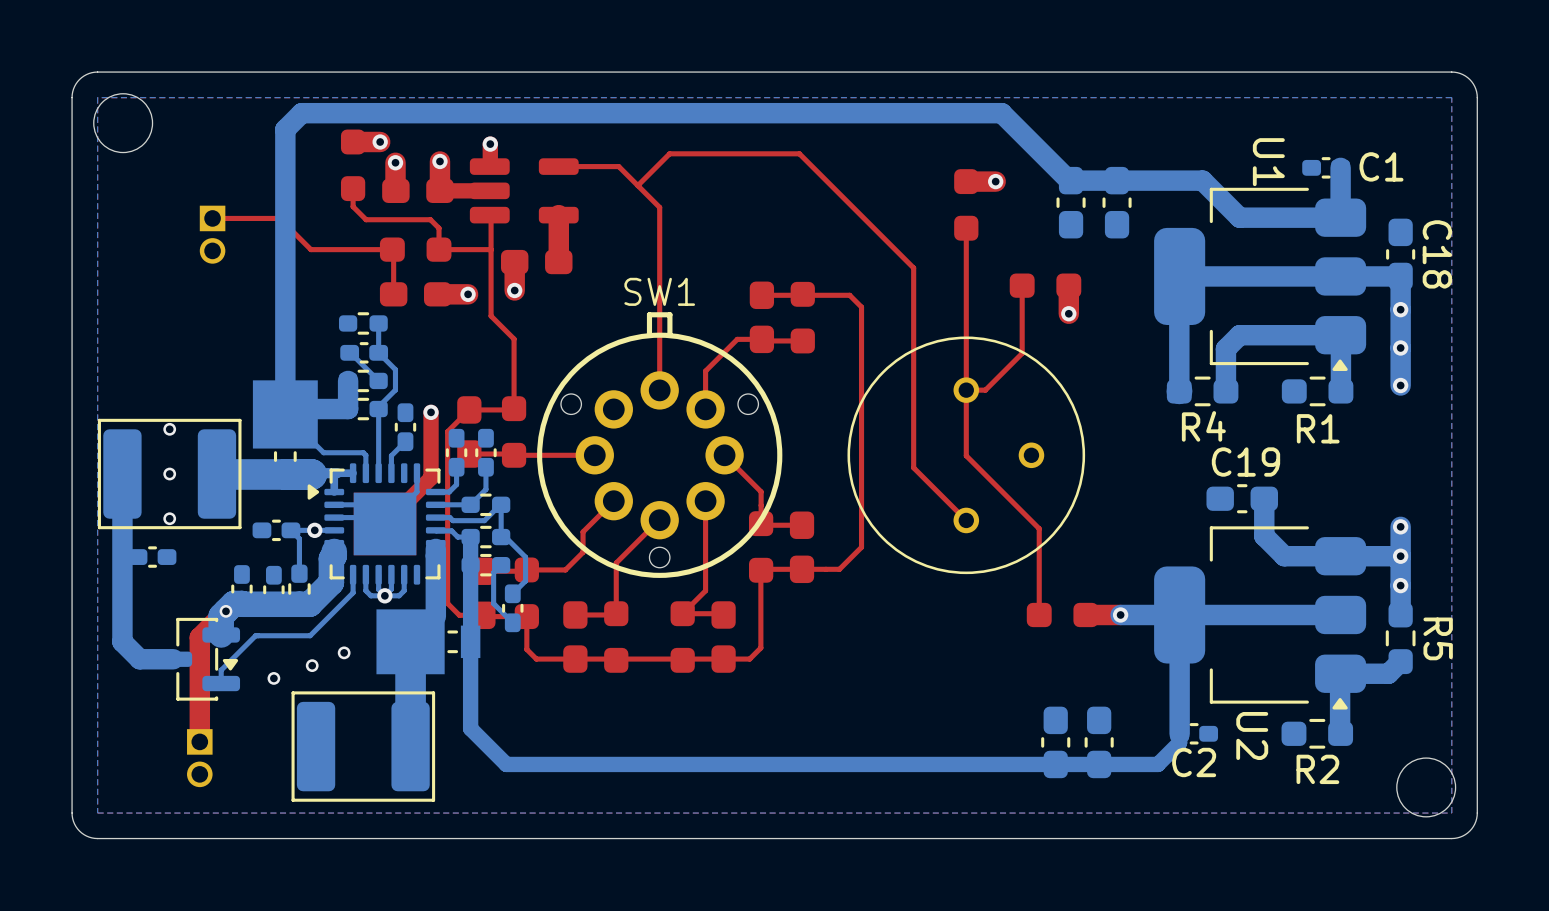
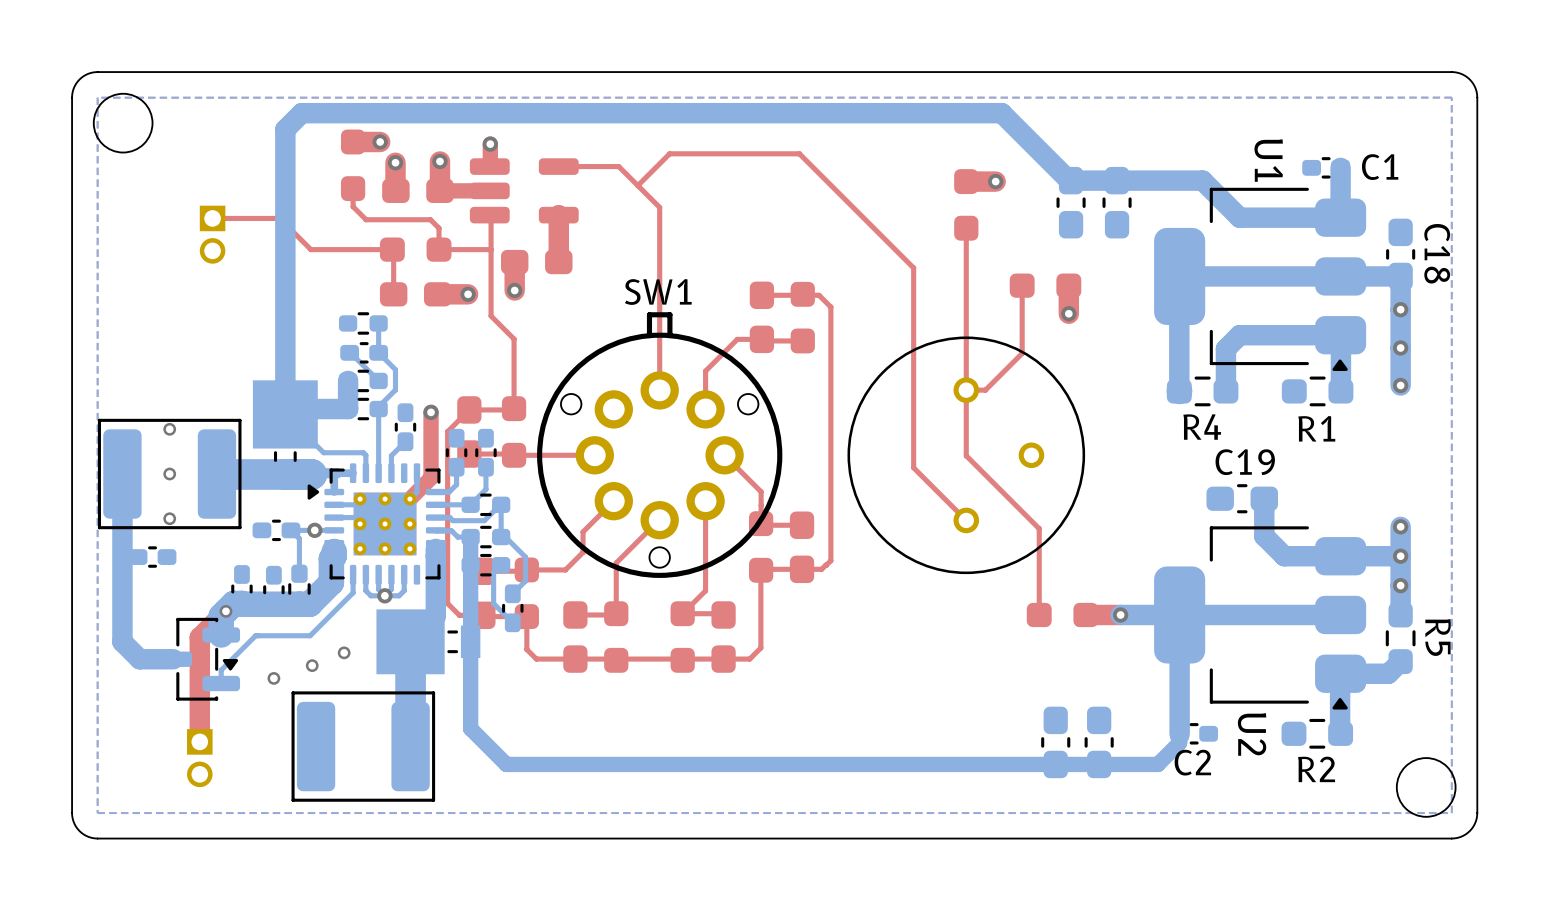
top track: (819, 295) (849, 295) (861, 307) (861, 547) (839, 569) (821, 569) -> (819, 295) (830, 307) (830, 560) (821, 569)
part footprint: [307, 463, 446, 585] -> [307, 463, 446, 585]

